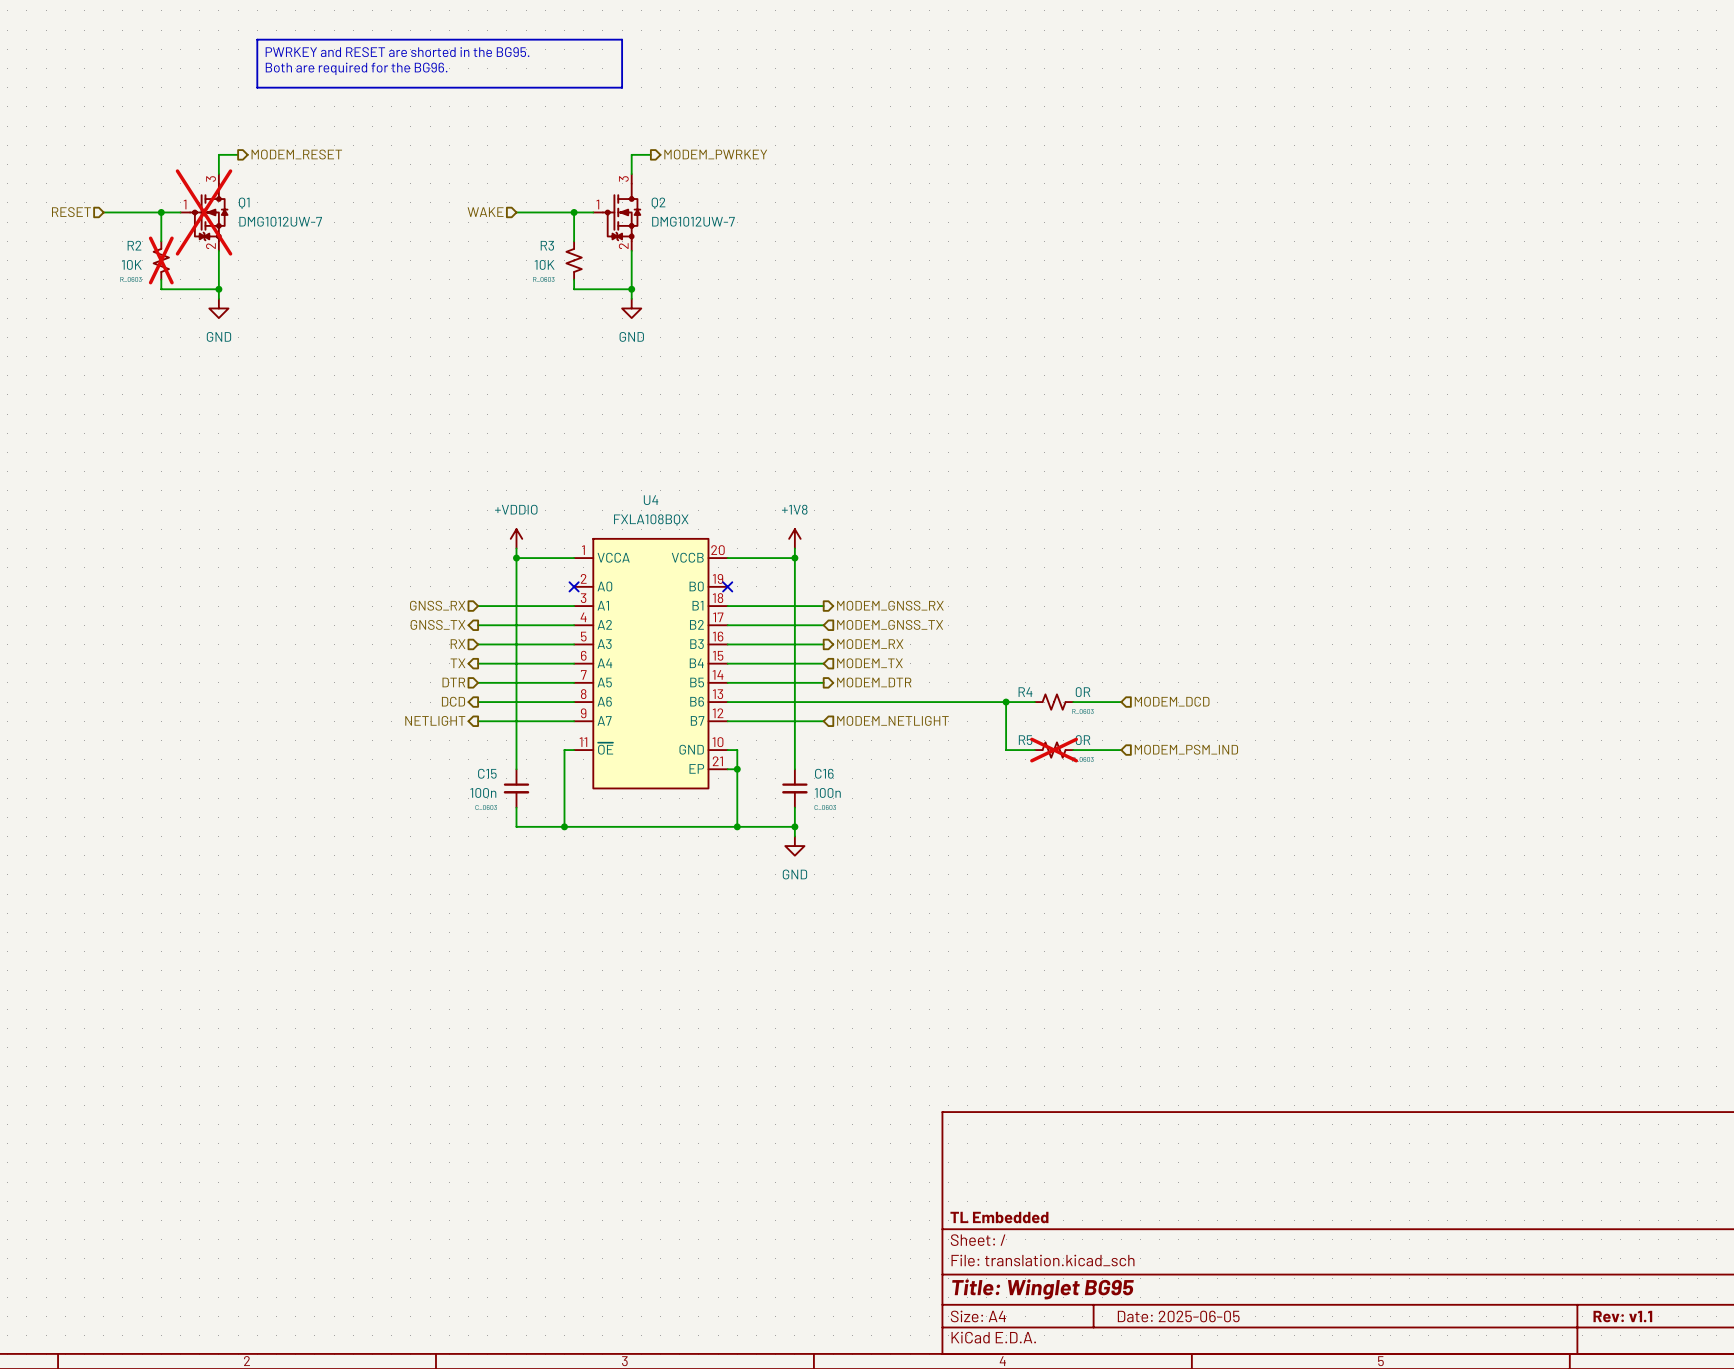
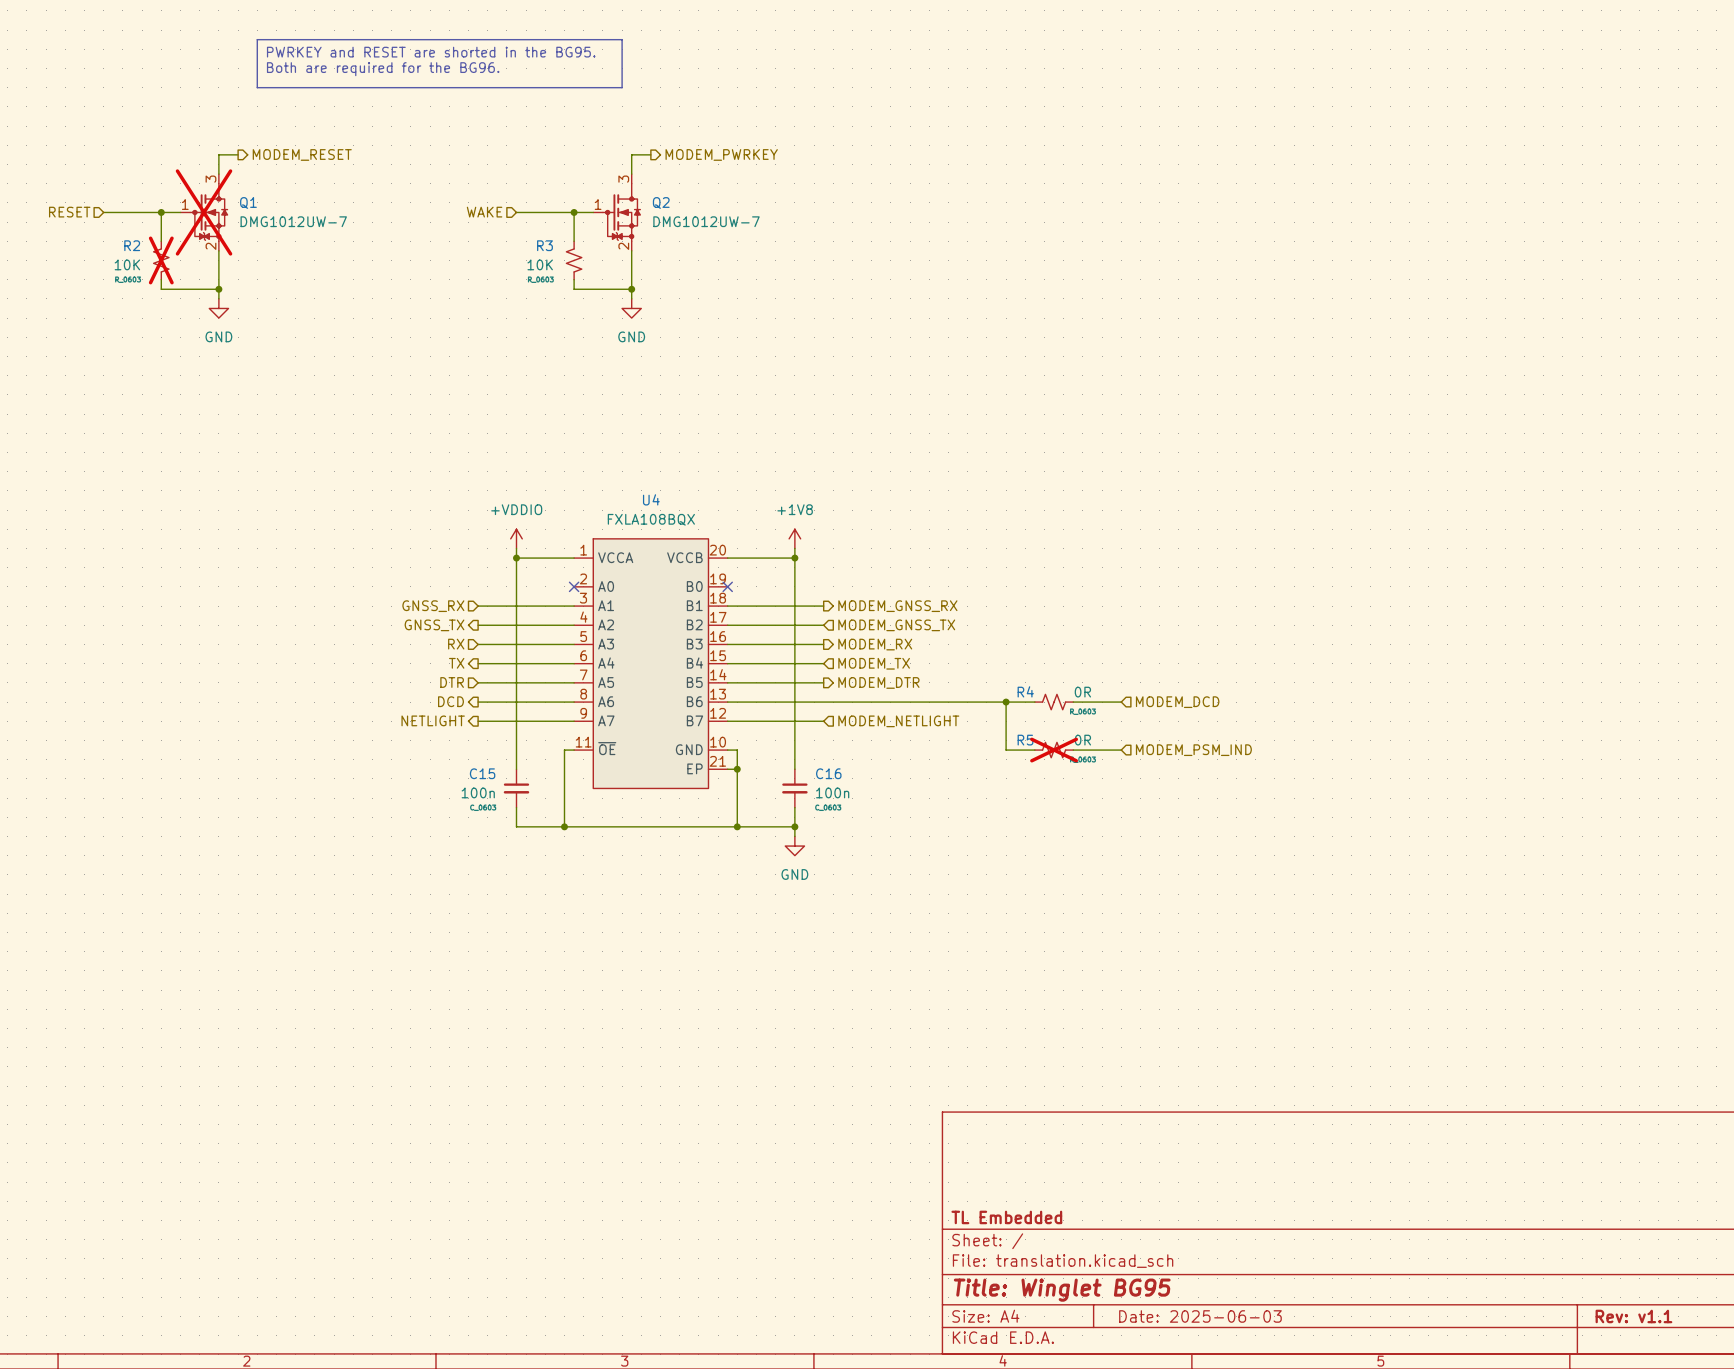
title block: Date: 2025-06-05 (1178, 1316) -> Date: 2025-06-03 (1200, 1316)

